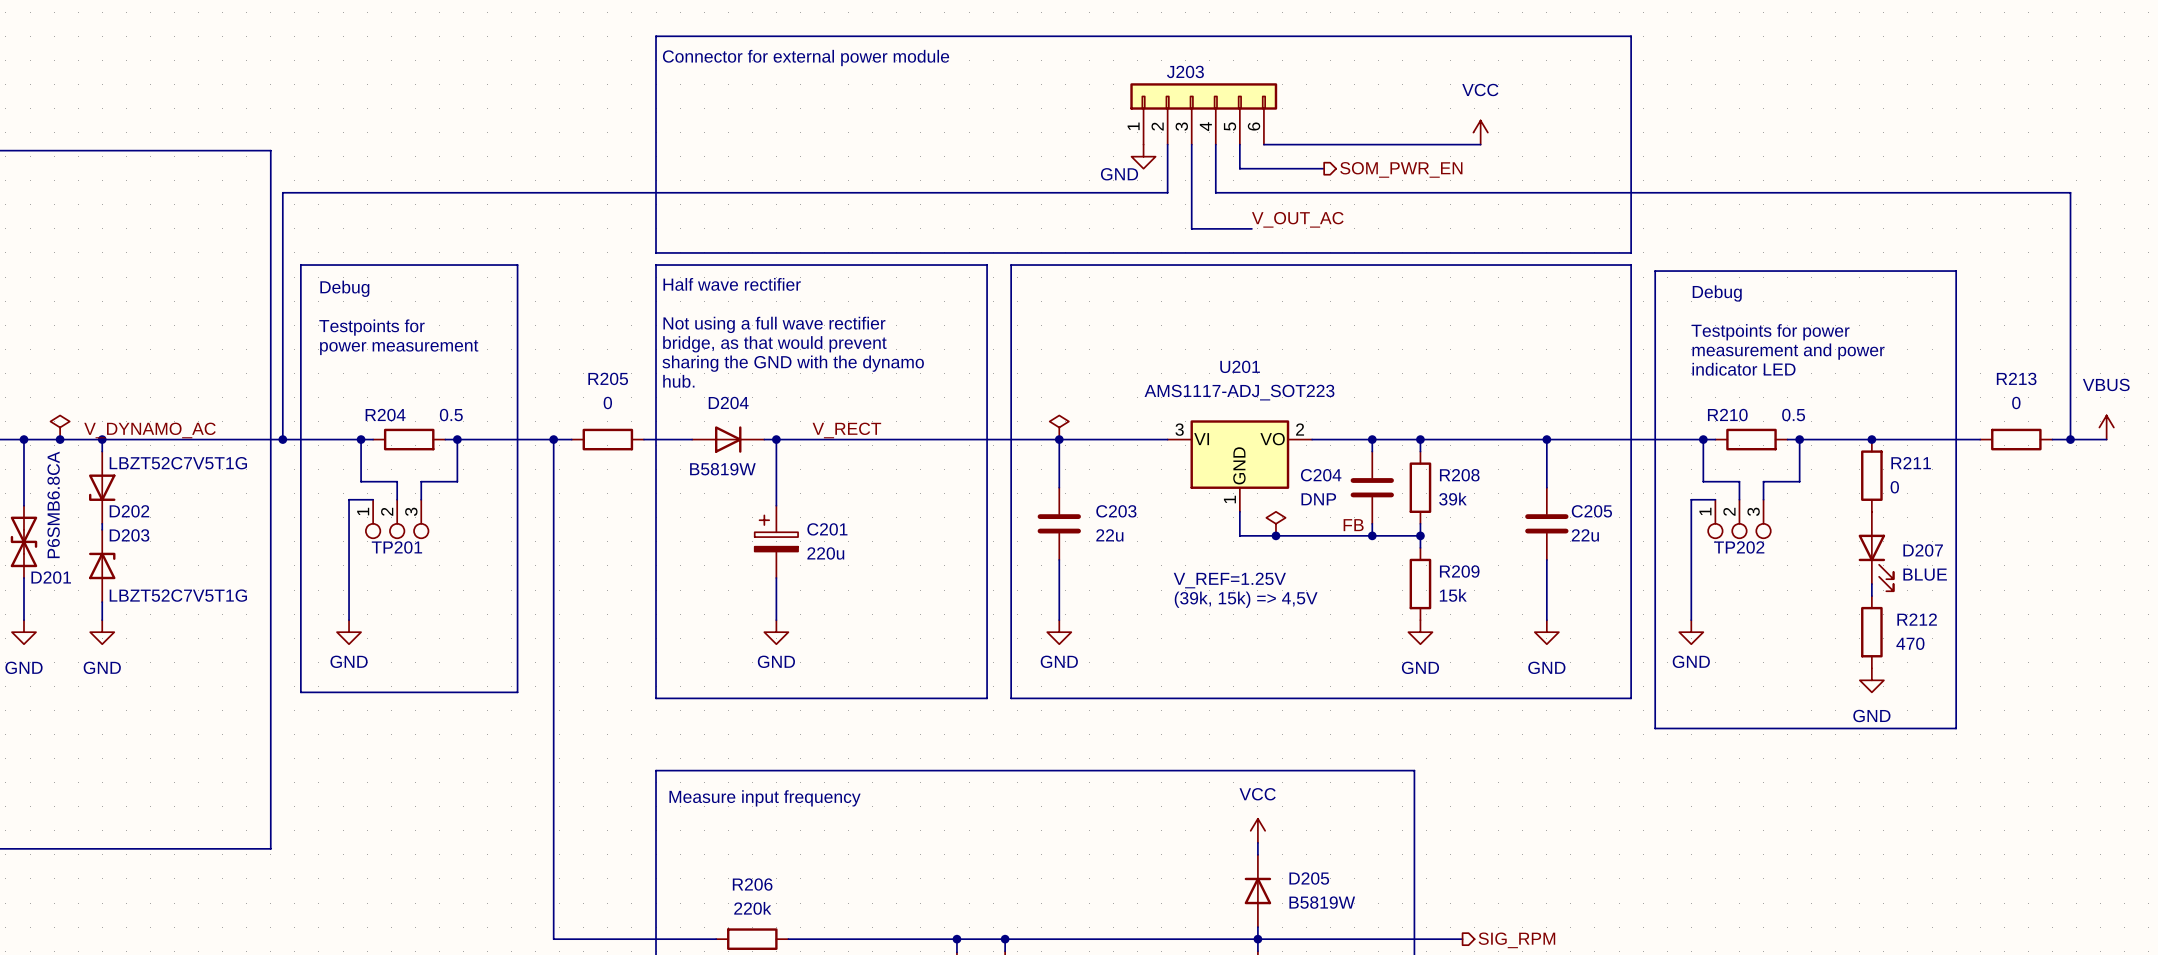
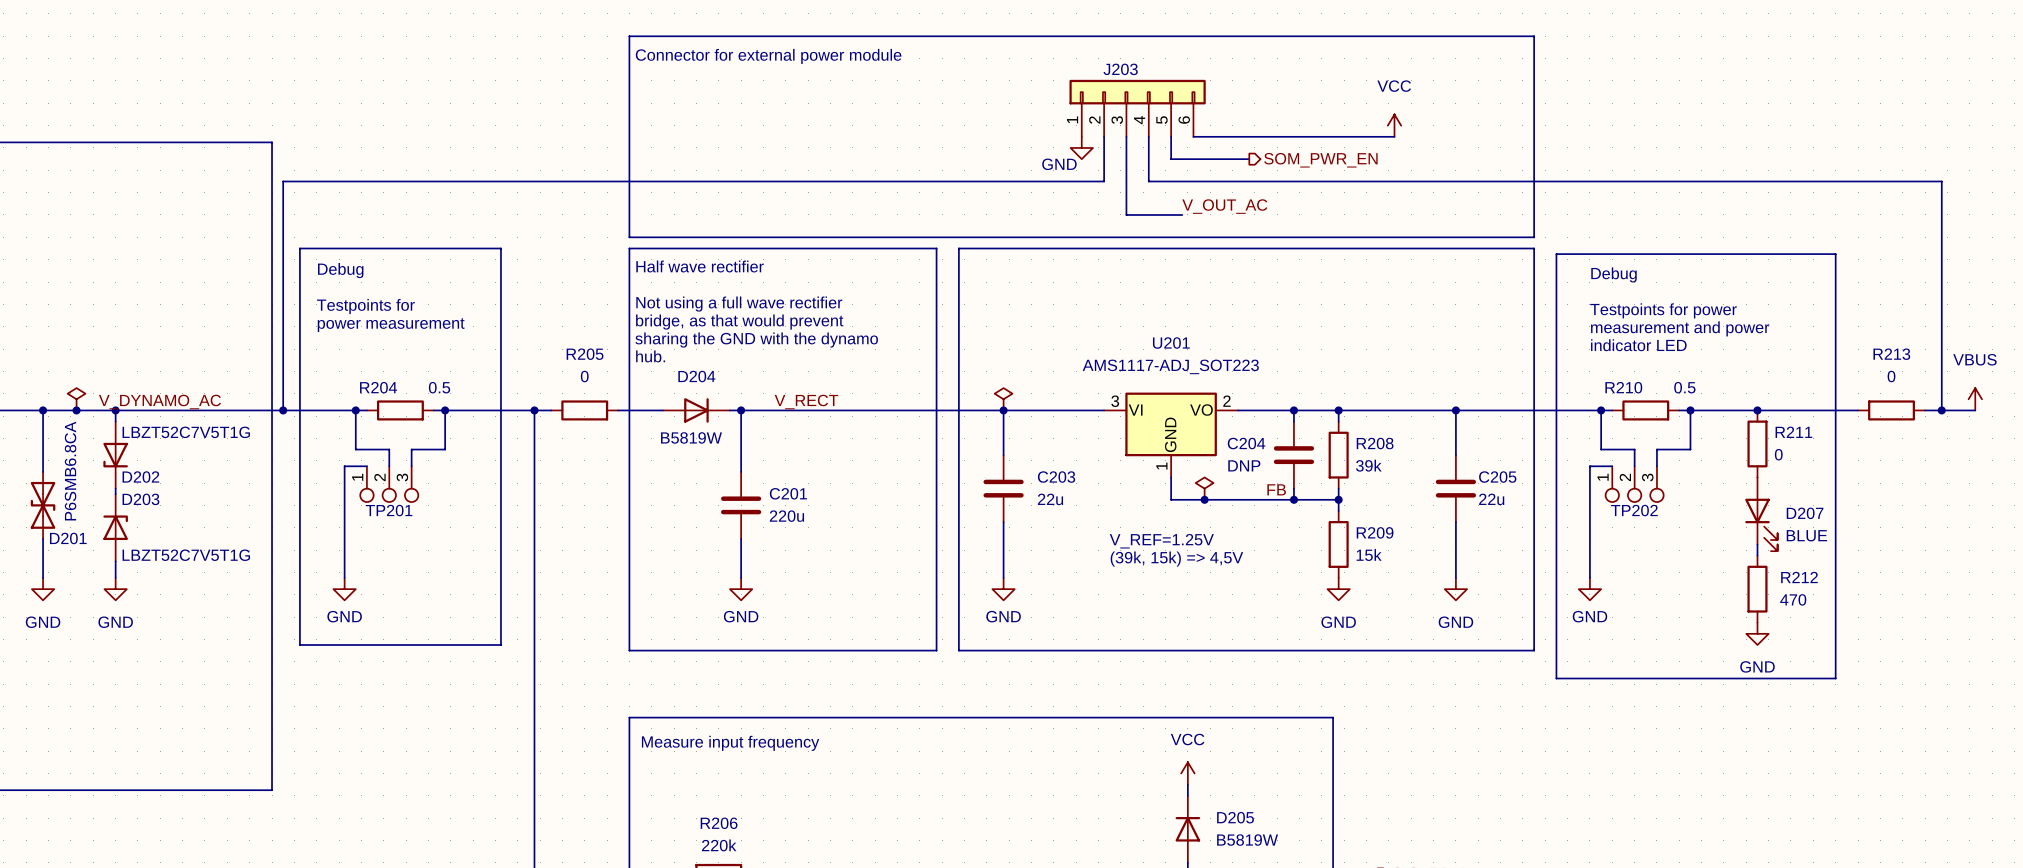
C201 symbol: [754, 505, 799, 579] -> [721, 471, 762, 539]

